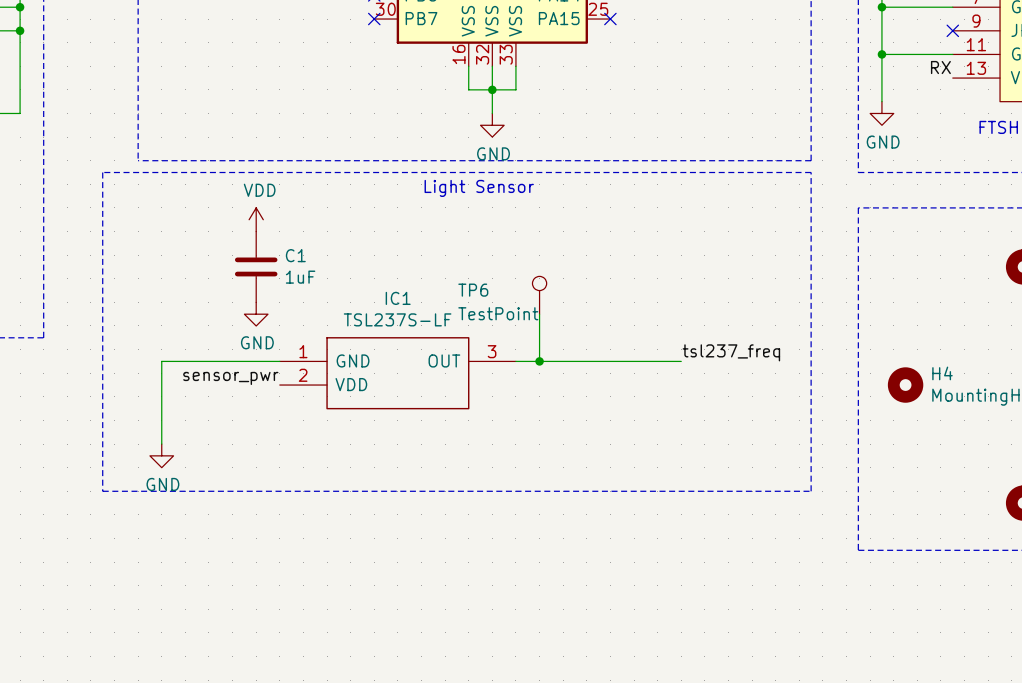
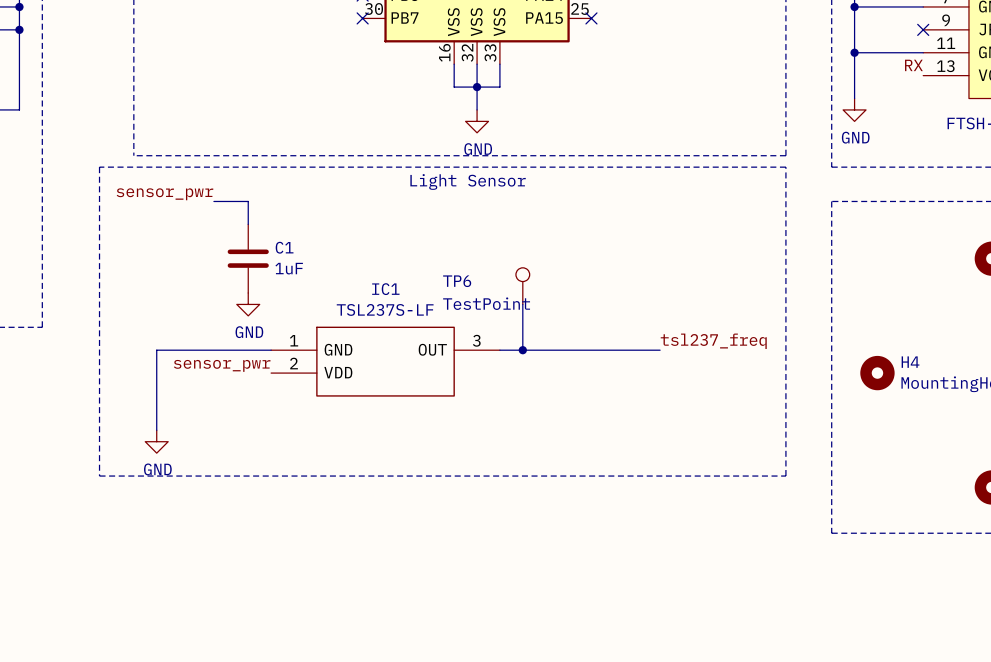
label: none -> sensor_pwr (164, 194)
wire: none -> (213, 201) (248, 201) (248, 224)
power symbol: VDD (256, 219) -> none

